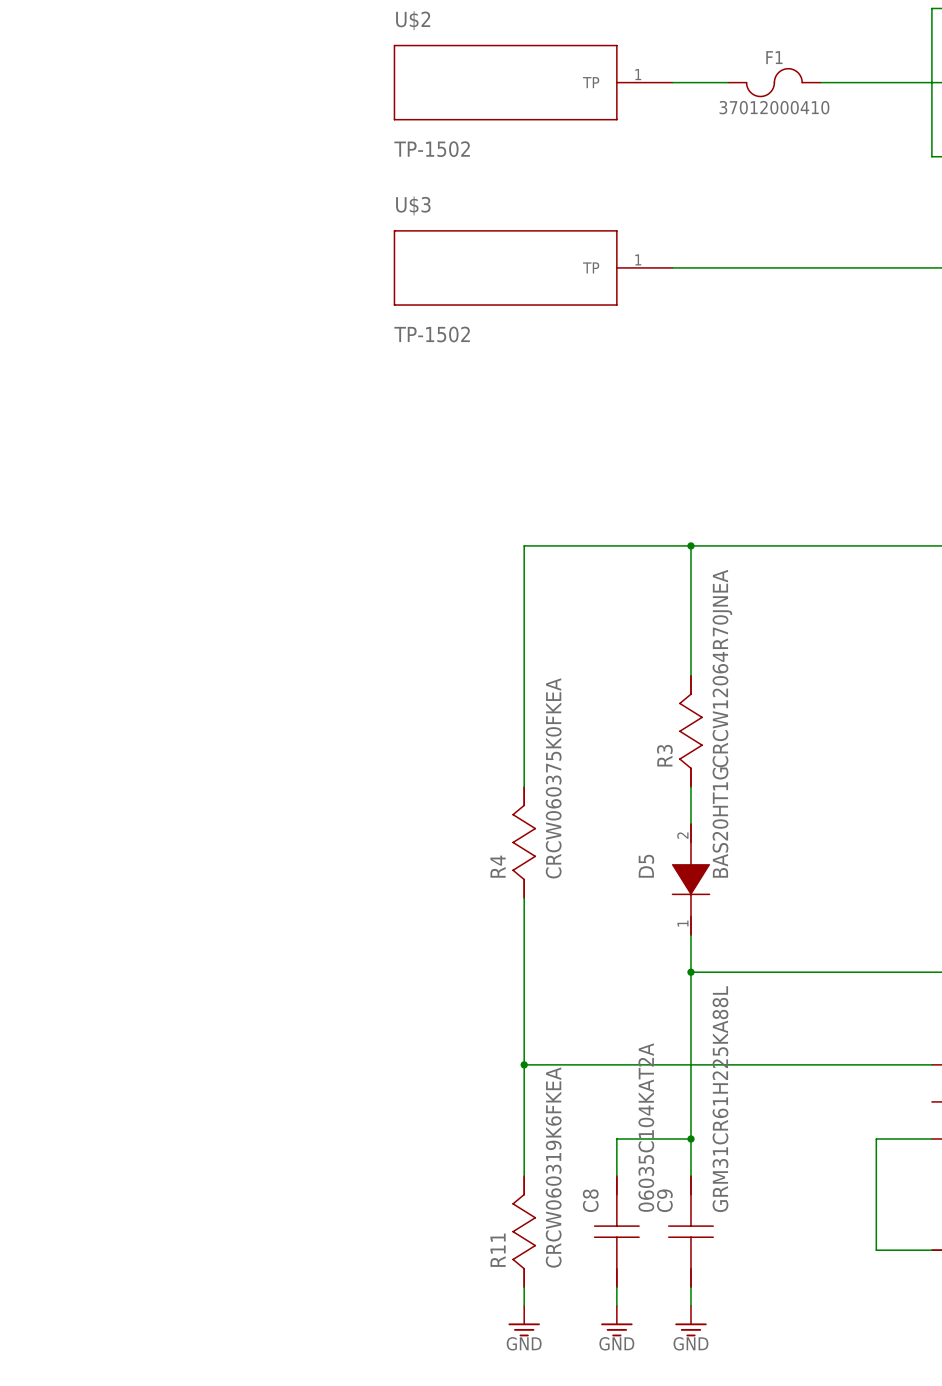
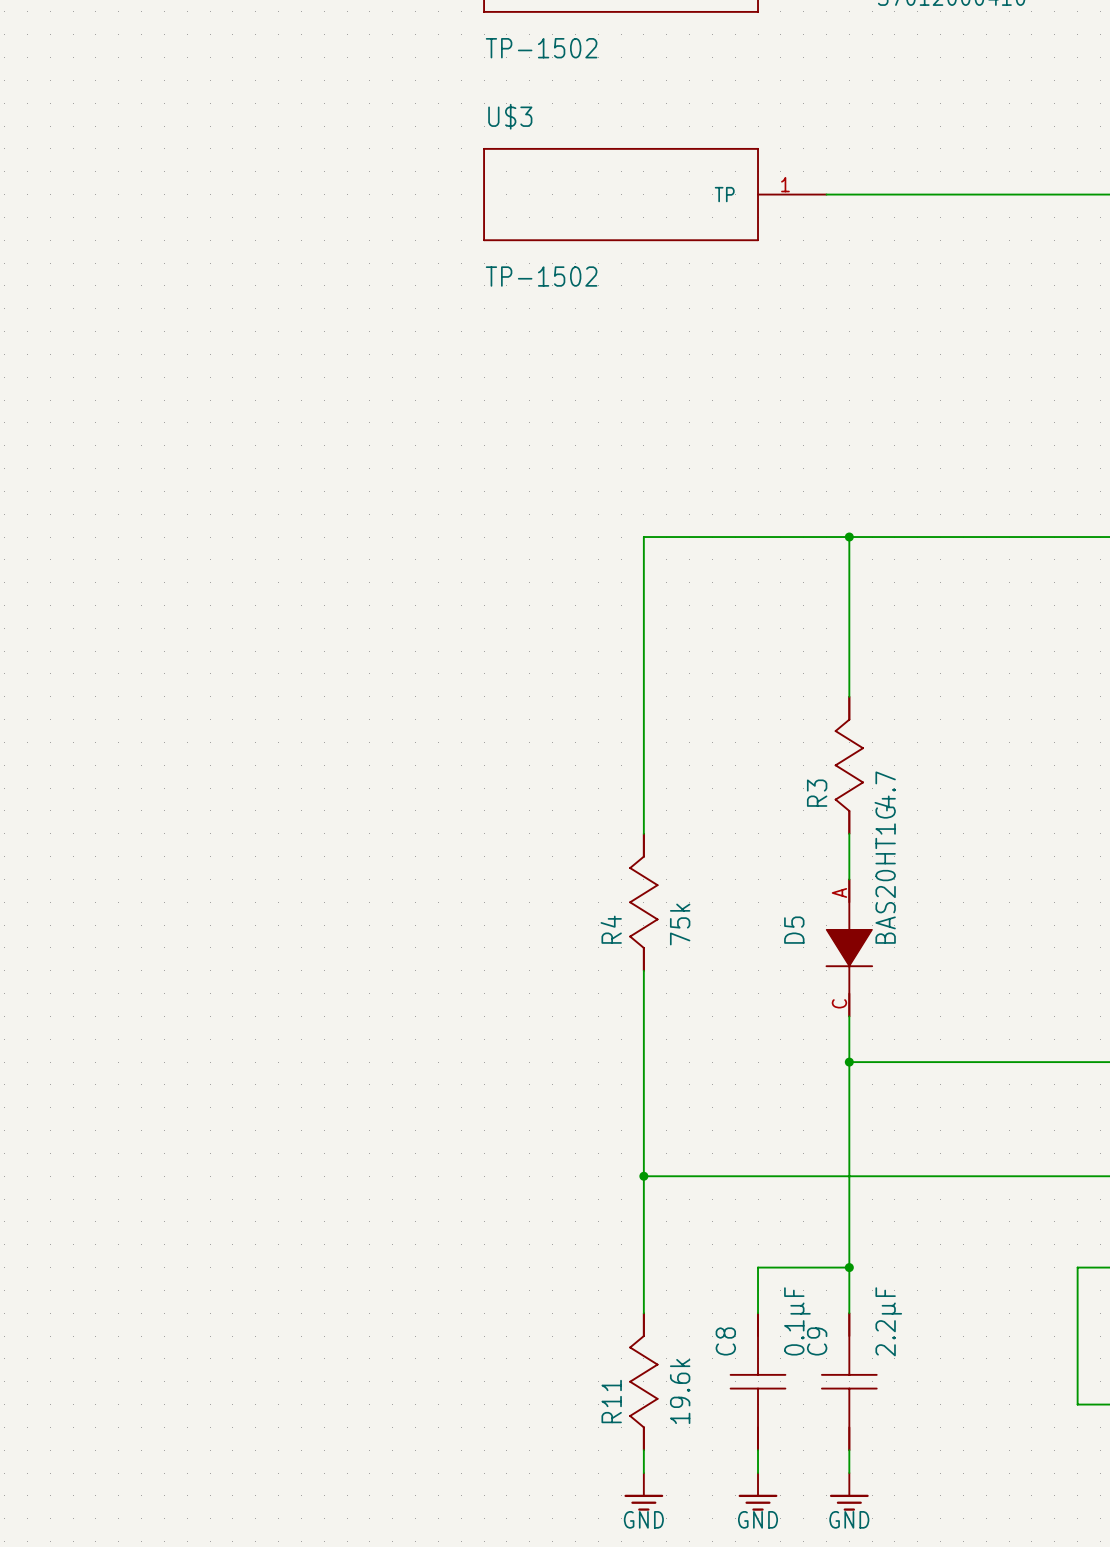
R3 value: CRCW12064R70JNEA (722, 668) -> 4.7 (885, 789)
R4 value: CRCW060375K0FKEA (553, 778) -> 75k (680, 924)
D5 pin number: 2 (682, 835) -> A (839, 892)
D5 pin number: 1 (682, 923) -> C (839, 1003)
C9 value: GRM31CR61H225KA88L (720, 1099) -> 2.2µF (888, 1321)
C8 value: 06035C104KAT2A (646, 1127) -> 0.1µF (797, 1321)
R11 value: CRCW060319K6FKEA (553, 1167) -> 19.6k (680, 1391)

